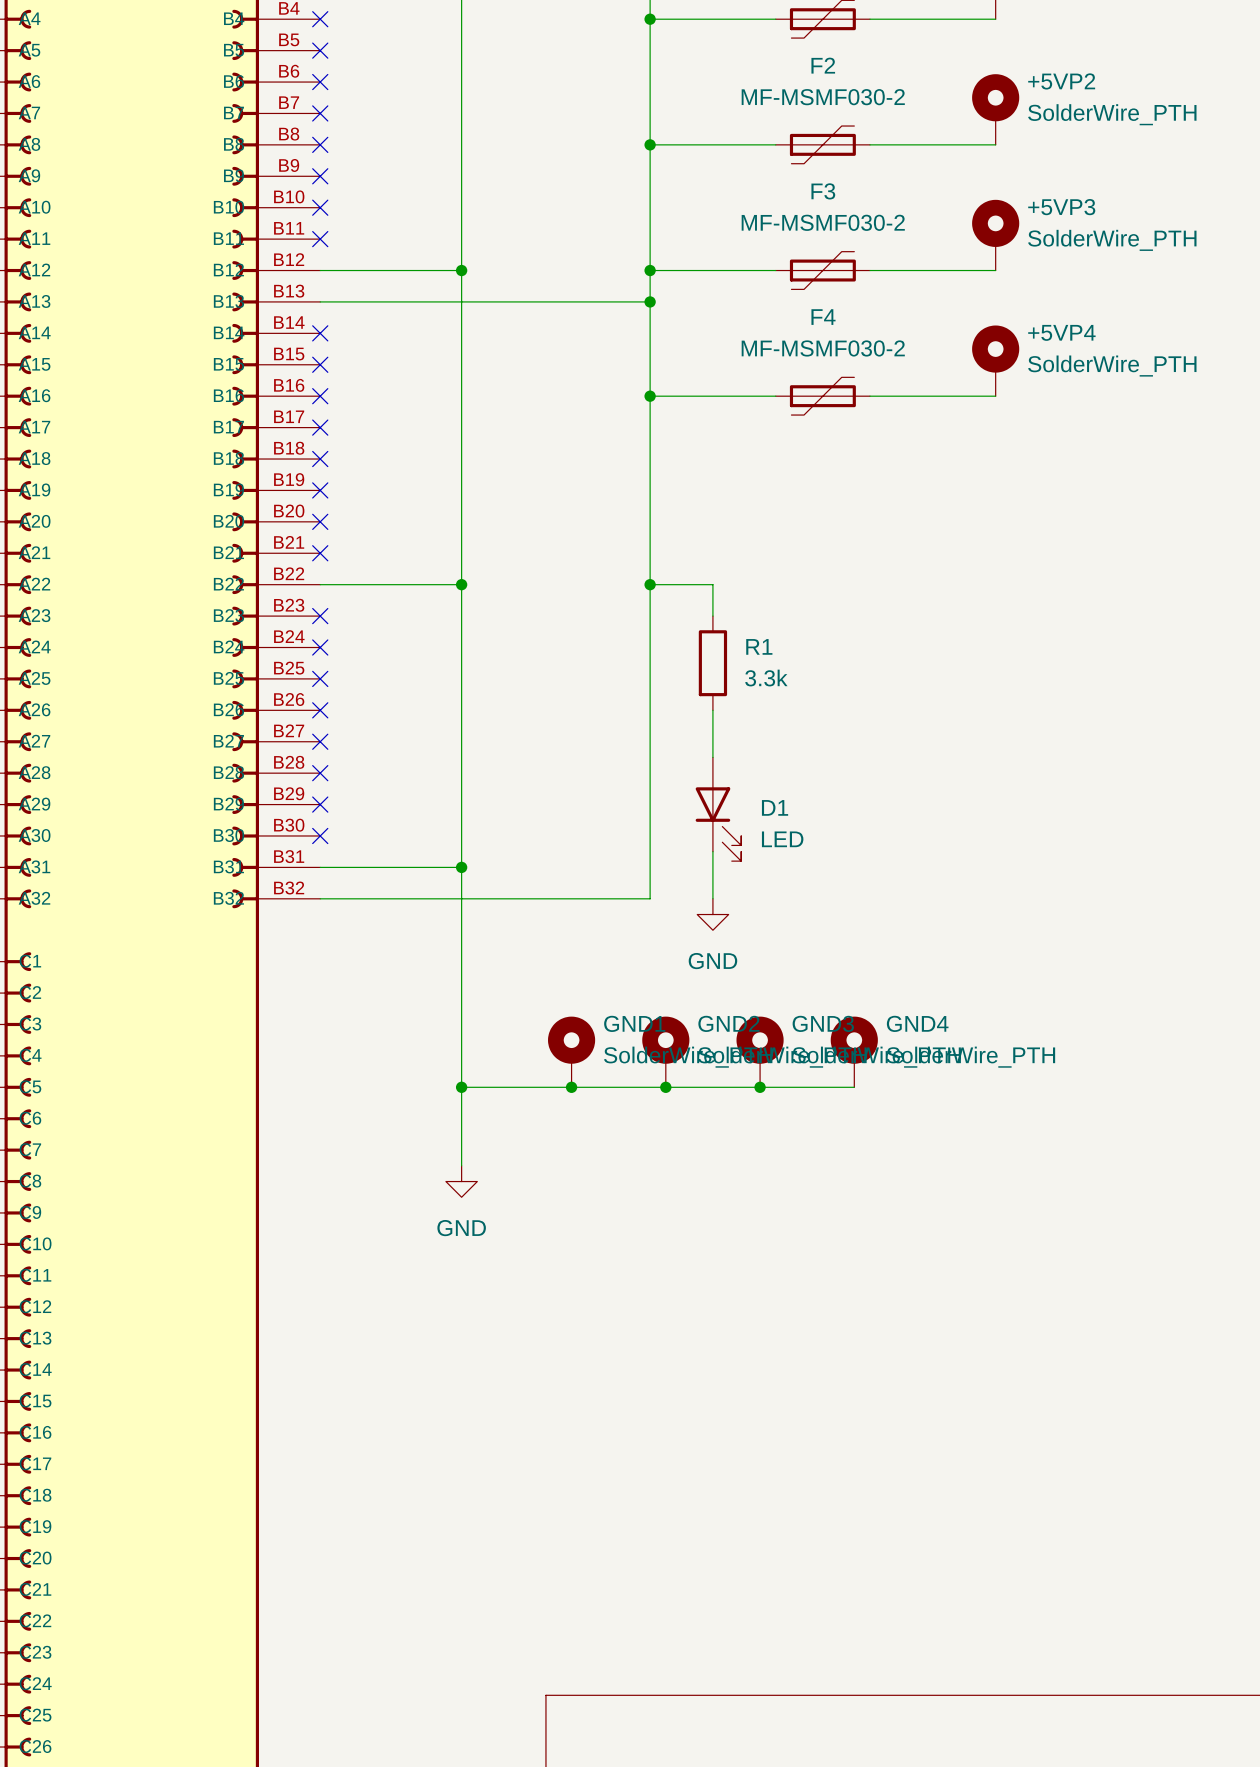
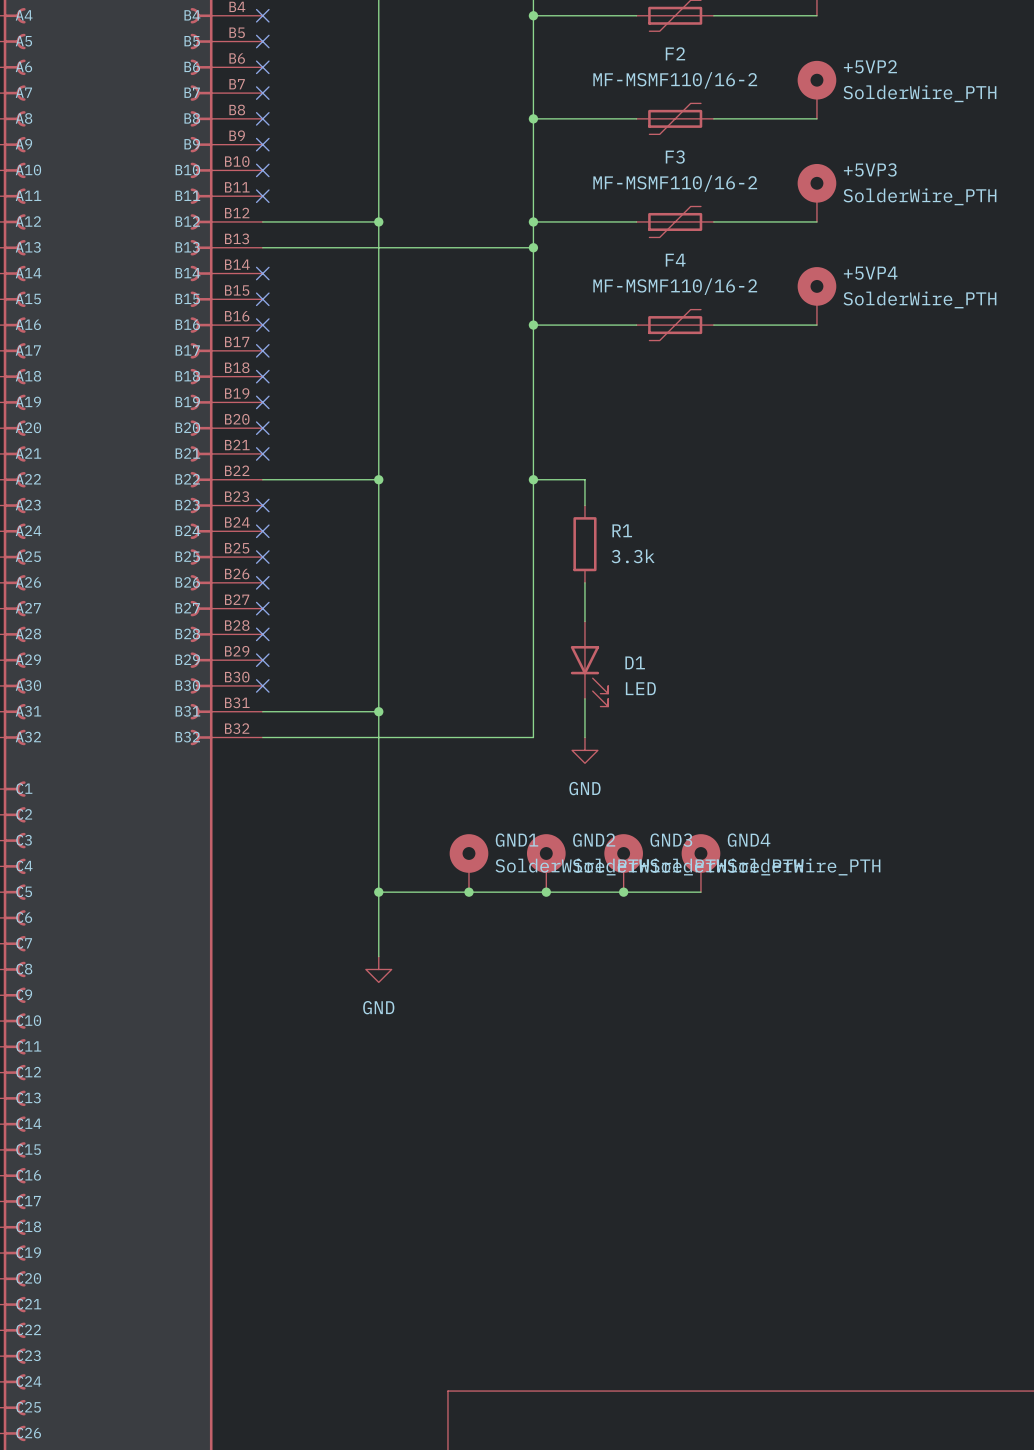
F2 value: MF-MSMF030-2 (823, 97) -> MF-MSMF110/16-2 (675, 80)
F3 value: MF-MSMF030-2 (823, 222) -> MF-MSMF110/16-2 (675, 183)
F4 value: MF-MSMF030-2 (823, 348) -> MF-MSMF110/16-2 (675, 286)

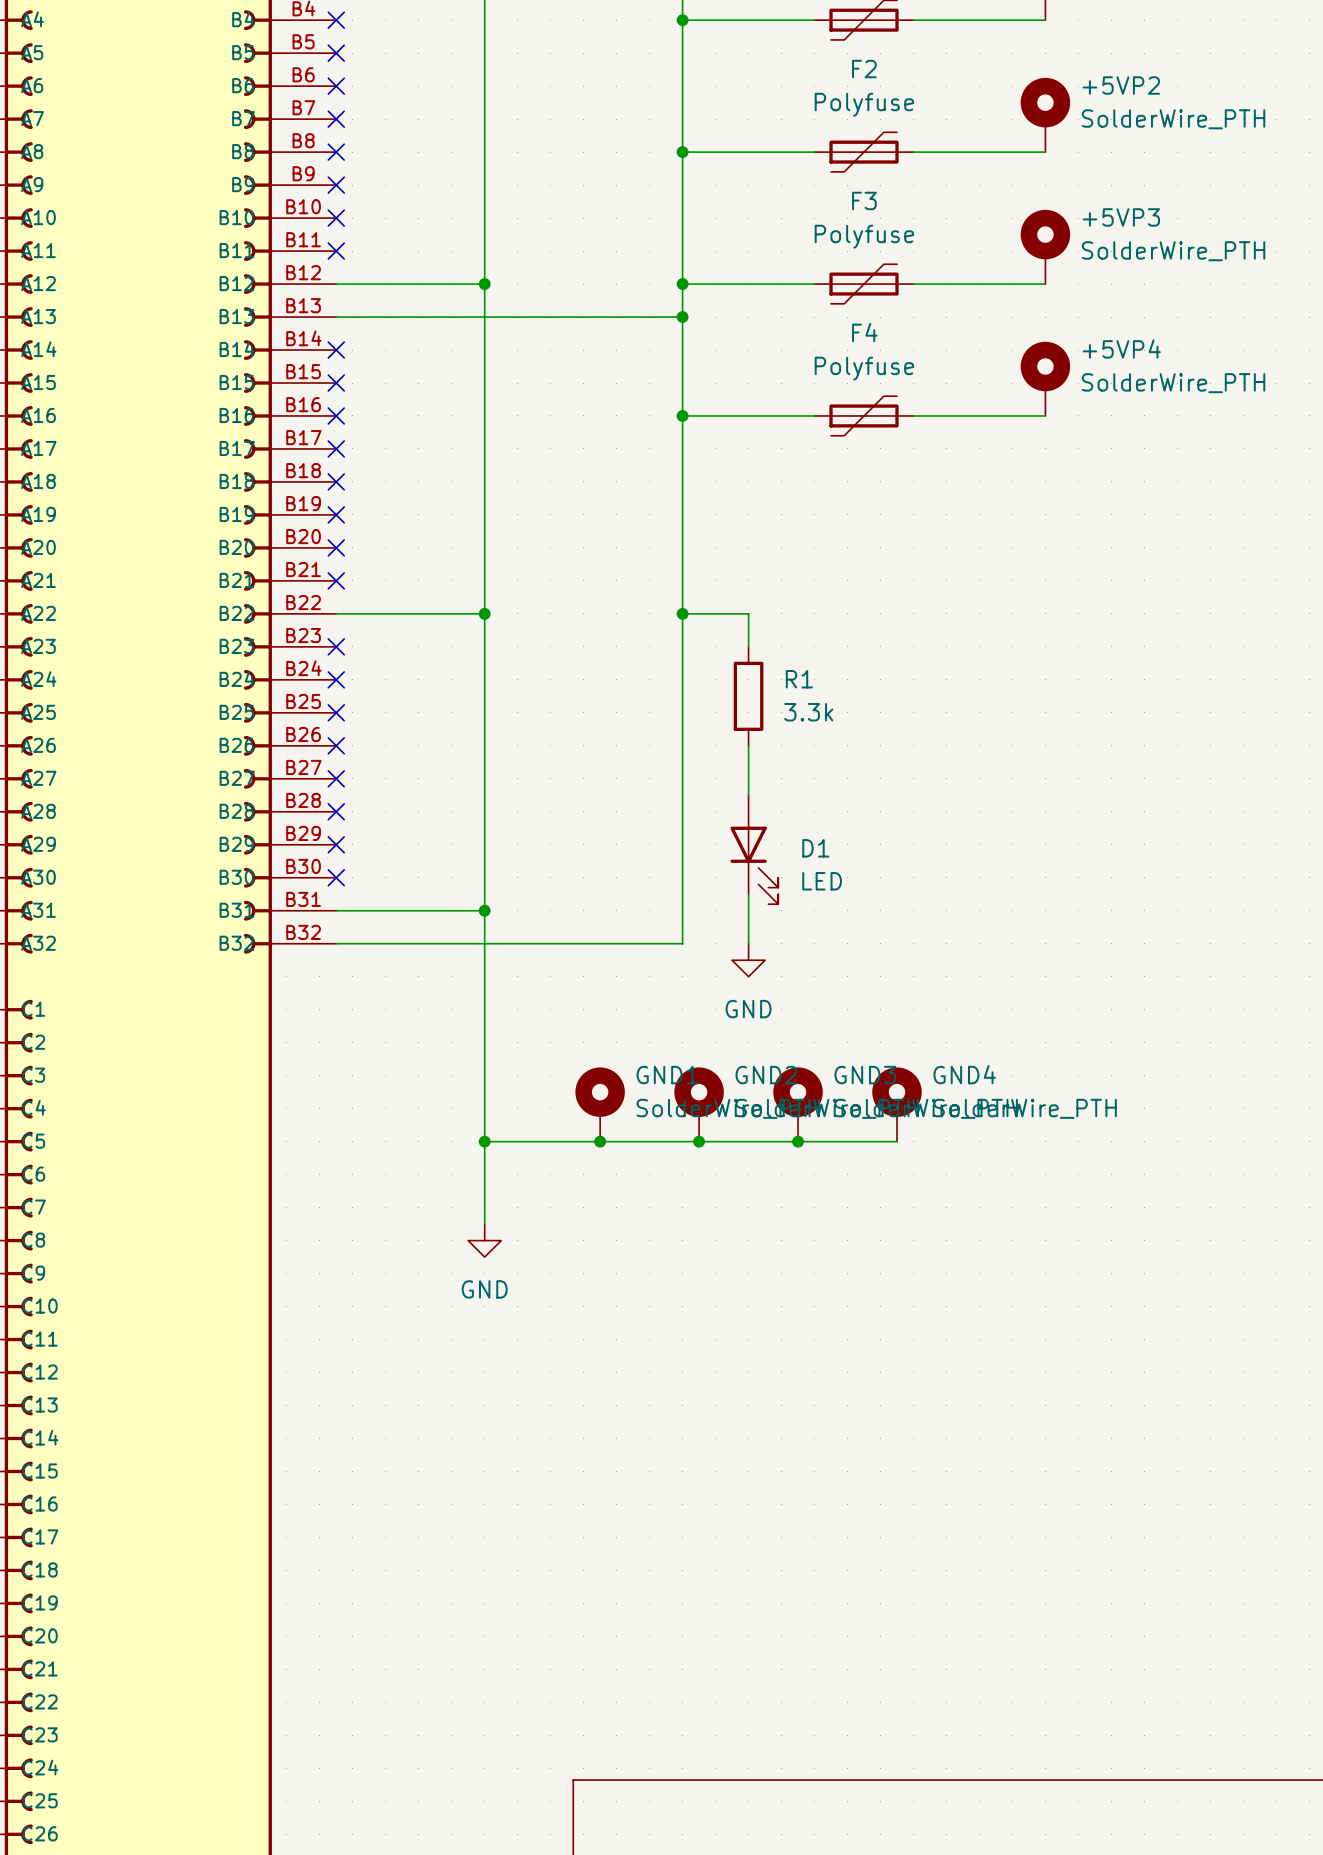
F2 value: MF-MSMF110/16-2 (675, 80) -> Polyfuse (864, 104)
F3 value: MF-MSMF110/16-2 (675, 183) -> Polyfuse (864, 236)
F4 value: MF-MSMF110/16-2 (675, 286) -> Polyfuse (864, 368)

